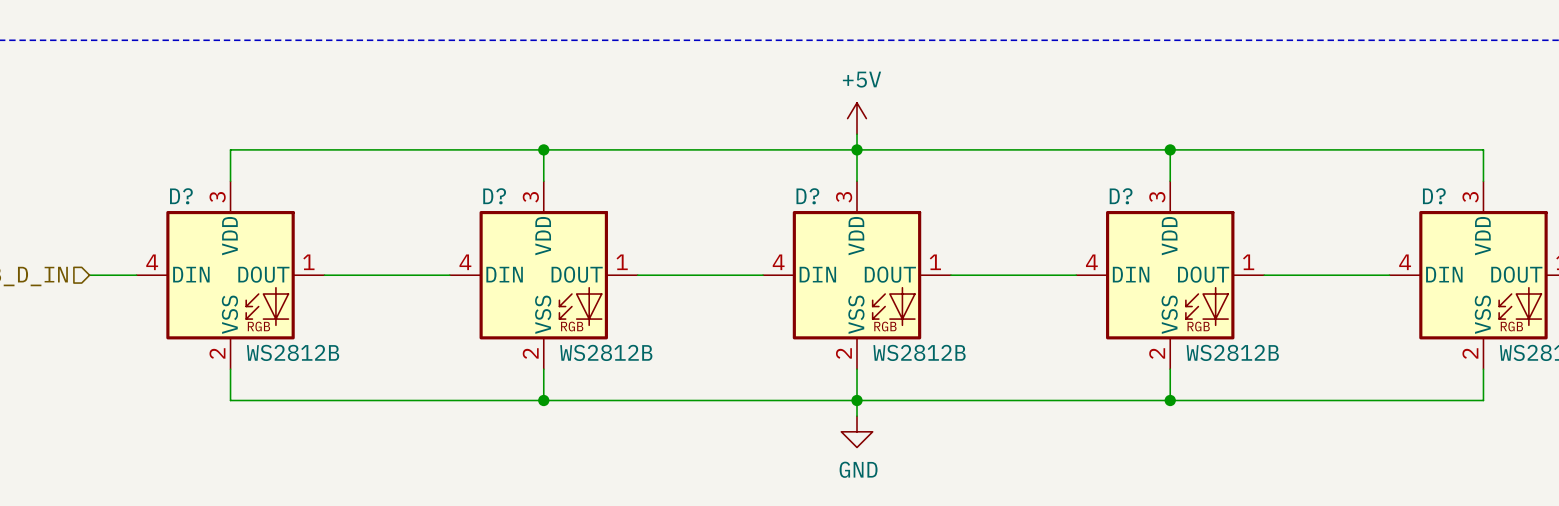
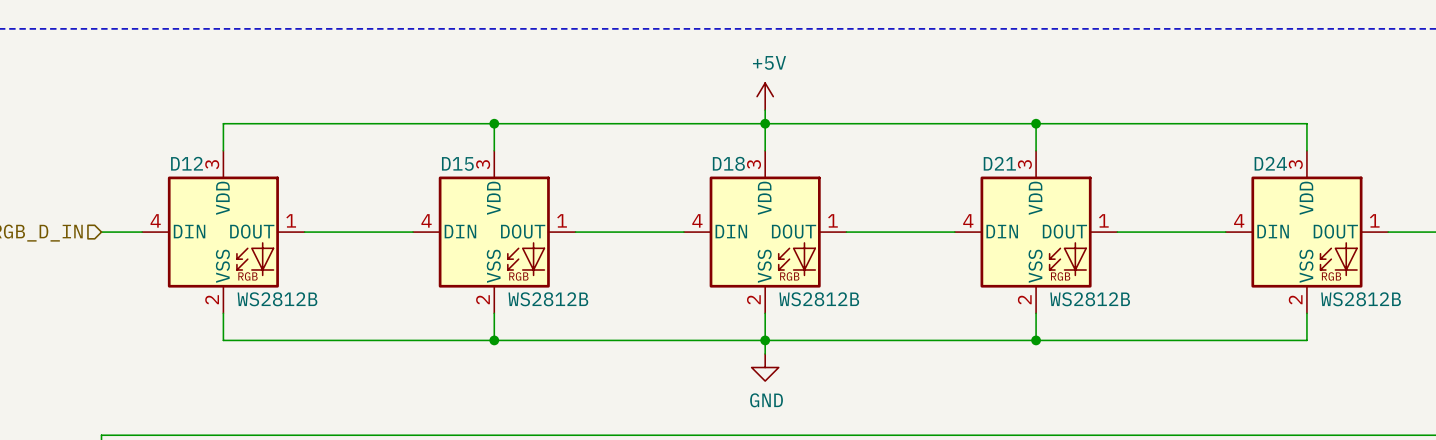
D? name: D? (181, 196) -> D12 (187, 163)
D? name: D? (494, 196) -> D15 (457, 163)
D? name: D? (807, 196) -> D18 (728, 163)
D? name: D? (1121, 196) -> D21 (999, 163)
D? name: D? (1434, 196) -> D24 (1270, 163)

